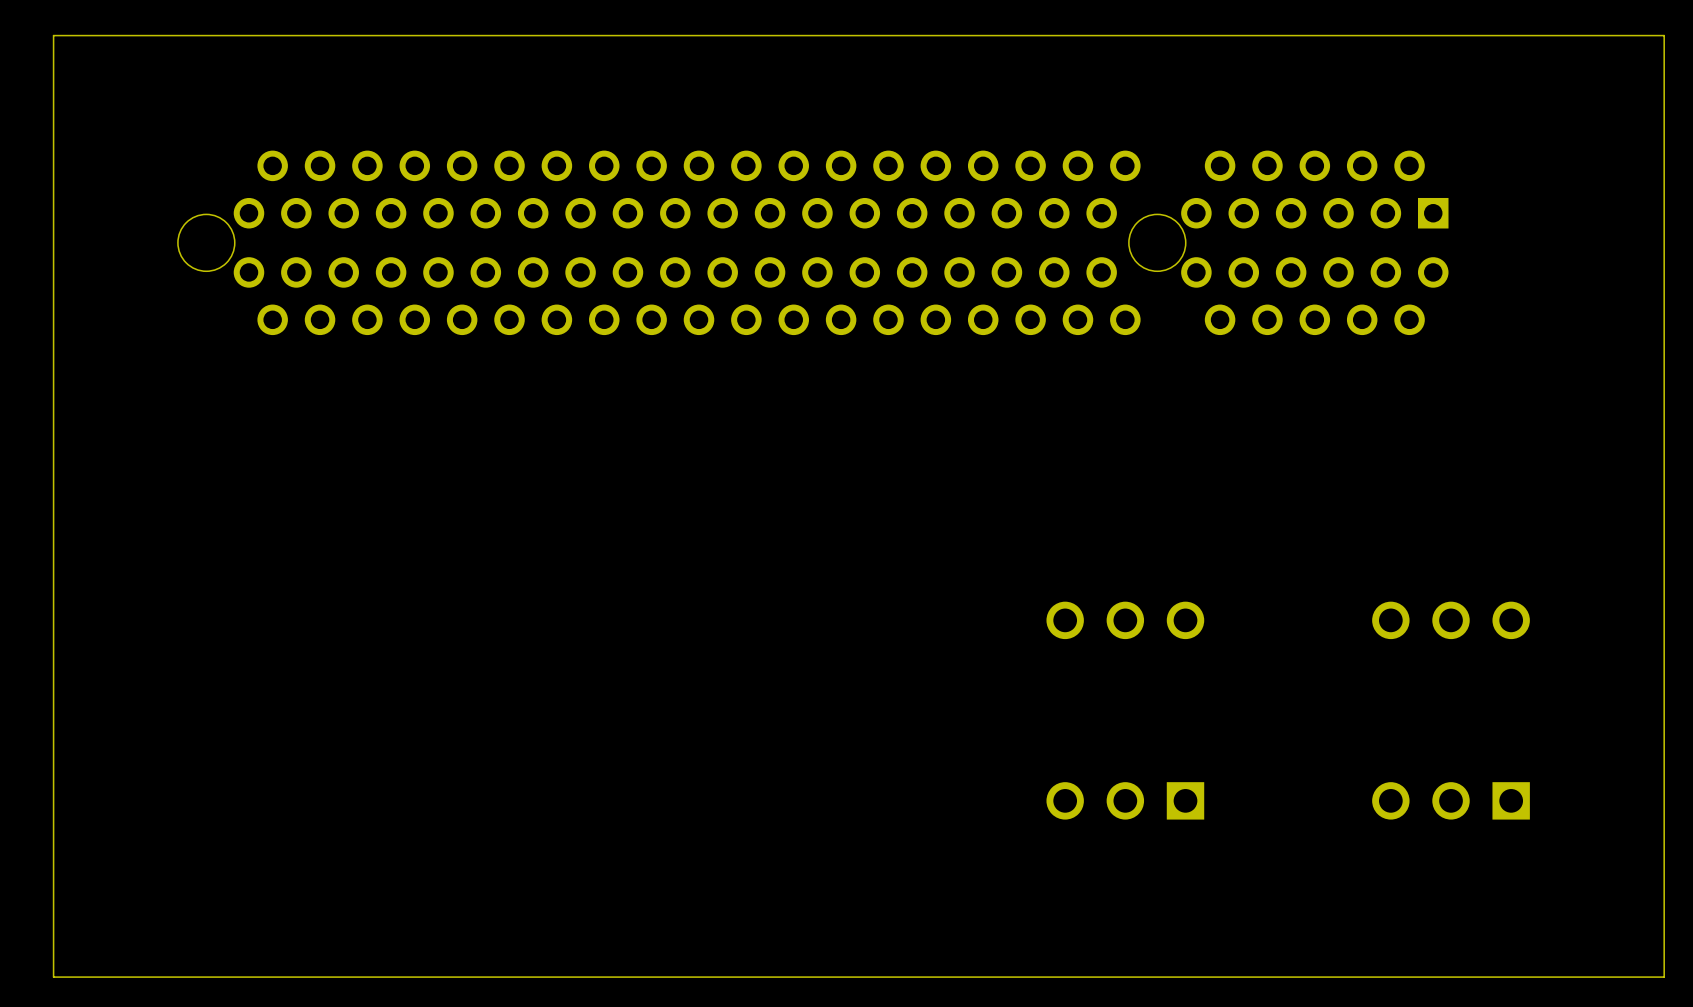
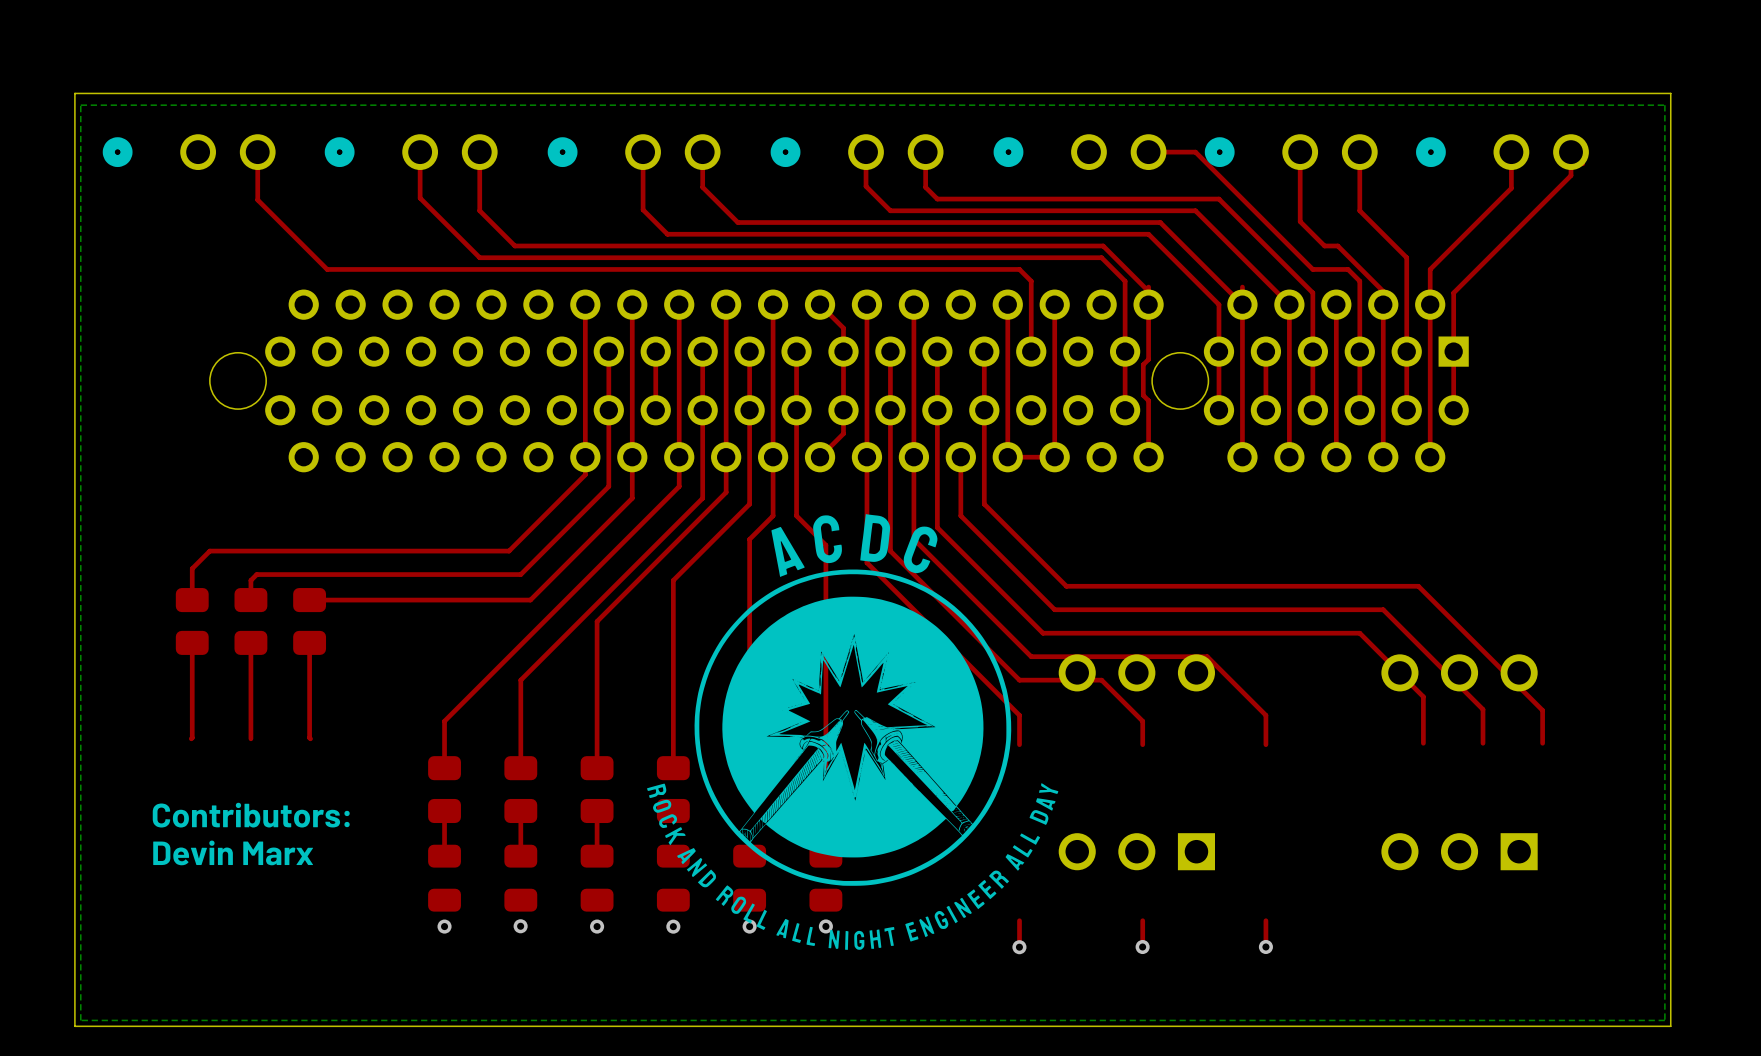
bottom zone outline: none -> (1664, 105) (1664, 1020) (80, 1020) (80, 105) (1664, 105)
part: none -> (189, 152)
top track: none -> (257, 152) (257, 199) (327, 269) (1019, 269) (1031, 281) (1031, 351)
part: none -> (411, 152)
top track: none -> (420, 152) (420, 198) (479, 257) (1101, 257) (1125, 281) (1125, 410)
top track: none -> (479, 152) (479, 210) (514, 245) (1103, 245) (1148, 291)
part: none -> (634, 152)
top track: none -> (643, 152) (643, 209) (667, 234) (1148, 234) (1218, 304) (1218, 410)
top track: none -> (702, 152) (702, 187) (737, 222) (1160, 222) (1242, 304)
part: none -> (857, 152)
top track: none -> (866, 152) (866, 186) (890, 210) (1195, 210) (1289, 304) (1289, 457)
top track: none -> (925, 152) (925, 187) (937, 199) (1218, 199) (1312, 292) (1312, 410)
part: none -> (1080, 152)
top track: none -> (1148, 152) (1195, 152) (1312, 269) (1348, 269) (1359, 281) (1359, 410)
part: none -> (1291, 152)
top track: none -> (1300, 152) (1300, 221) (1324, 245) (1337, 245) (1383, 291) (1383, 457)
top track: none -> (1359, 152) (1359, 210) (1406, 257) (1406, 410)
part: none -> (1502, 152)
top track: none -> (1511, 152) (1511, 188) (1430, 269) (1430, 457)
top track: none -> (1582, 163) (1571, 152) (1571, 175) (1453, 292) (1453, 410)
top track: none -> (1148, 287) (1148, 359) (1143, 364) (1143, 395) (1148, 400) (1148, 457)
top track: none -> (1242, 287) (1242, 457)
part position: (813, 242) -> (839, 380)
top track: none -> (585, 304) (585, 474) (509, 551) (209, 551) (192, 568) (192, 600)
top track: none -> (632, 304) (632, 498) (530, 600) (309, 600)
top track: none -> (679, 304) (679, 486) (444, 721) (444, 768)
top track: none -> (726, 304) (726, 492) (597, 621) (597, 768)
top track: none -> (773, 304) (773, 515) (749, 539) (749, 768)
top track: none -> (820, 304) (843, 328) (843, 433) (820, 457)
top track: none -> (866, 304) (866, 562) (1019, 715) (1019, 744)
top track: none -> (913, 304) (913, 539) (1031, 656) (1207, 656) (1265, 715) (1265, 744)
top track: none -> (1054, 304) (1054, 457) (1007, 457) (1007, 304)
top track: none -> (1336, 304) (1336, 457)
top track: none -> (608, 351) (608, 486) (520, 574) (256, 574) (250, 580) (250, 600)
top track: none -> (655, 351) (655, 410)
top track: none -> (702, 351) (702, 498) (520, 680) (520, 768)
top track: none -> (749, 351) (749, 504) (673, 580) (673, 768)
top track: none -> (796, 351) (796, 515) (825, 545) (825, 768)
top track: none -> (890, 351) (890, 551) (1019, 680) (1101, 680) (1142, 721) (1142, 744)
top track: none -> (937, 351) (937, 527) (1042, 633) (1359, 633) (1423, 696) (1423, 743)
top track: none -> (984, 351) (984, 504) (1066, 586) (1418, 586) (1542, 710) (1542, 743)
top track: none -> (1265, 351) (1265, 410)
top track: none -> (960, 457) (960, 515) (1054, 609) (1383, 609) (1483, 709) (1483, 743)
drawing: none -> [647, 514, 1059, 950]
part: none -> (192, 621)
part: none -> (250, 621)
part: none -> (309, 621)
top track: none -> (192, 642) (191, 738)
top track: none -> (250, 642) (250, 738)
top track: none -> (309, 642) (310, 738)
part: none -> (444, 789)
part: none -> (520, 789)
part: none -> (597, 789)
part: none -> (673, 789)
top track: none -> (444, 810) (444, 856)
top track: none -> (520, 810) (520, 856)
top track: none -> (597, 810) (597, 856)
text: none -> Contributors: (251, 815)
text: none -> Devin Marx (233, 852)
part: none -> (444, 878)
part: none -> (520, 878)
part: none -> (597, 878)
part: none -> (673, 878)
part: none -> (749, 878)
part: none -> (825, 878)
top track: none -> (1019, 920) (1019, 947)
top track: none -> (1142, 920) (1142, 946)
top track: none -> (1265, 920) (1265, 946)
via: none -> (444, 926)
via: none -> (520, 926)
via: none -> (597, 926)
via: none -> (673, 926)
via: none -> (749, 926)
via: none -> (825, 926)
via: none -> (1019, 947)
via: none -> (1142, 947)
via: none -> (1265, 946)

